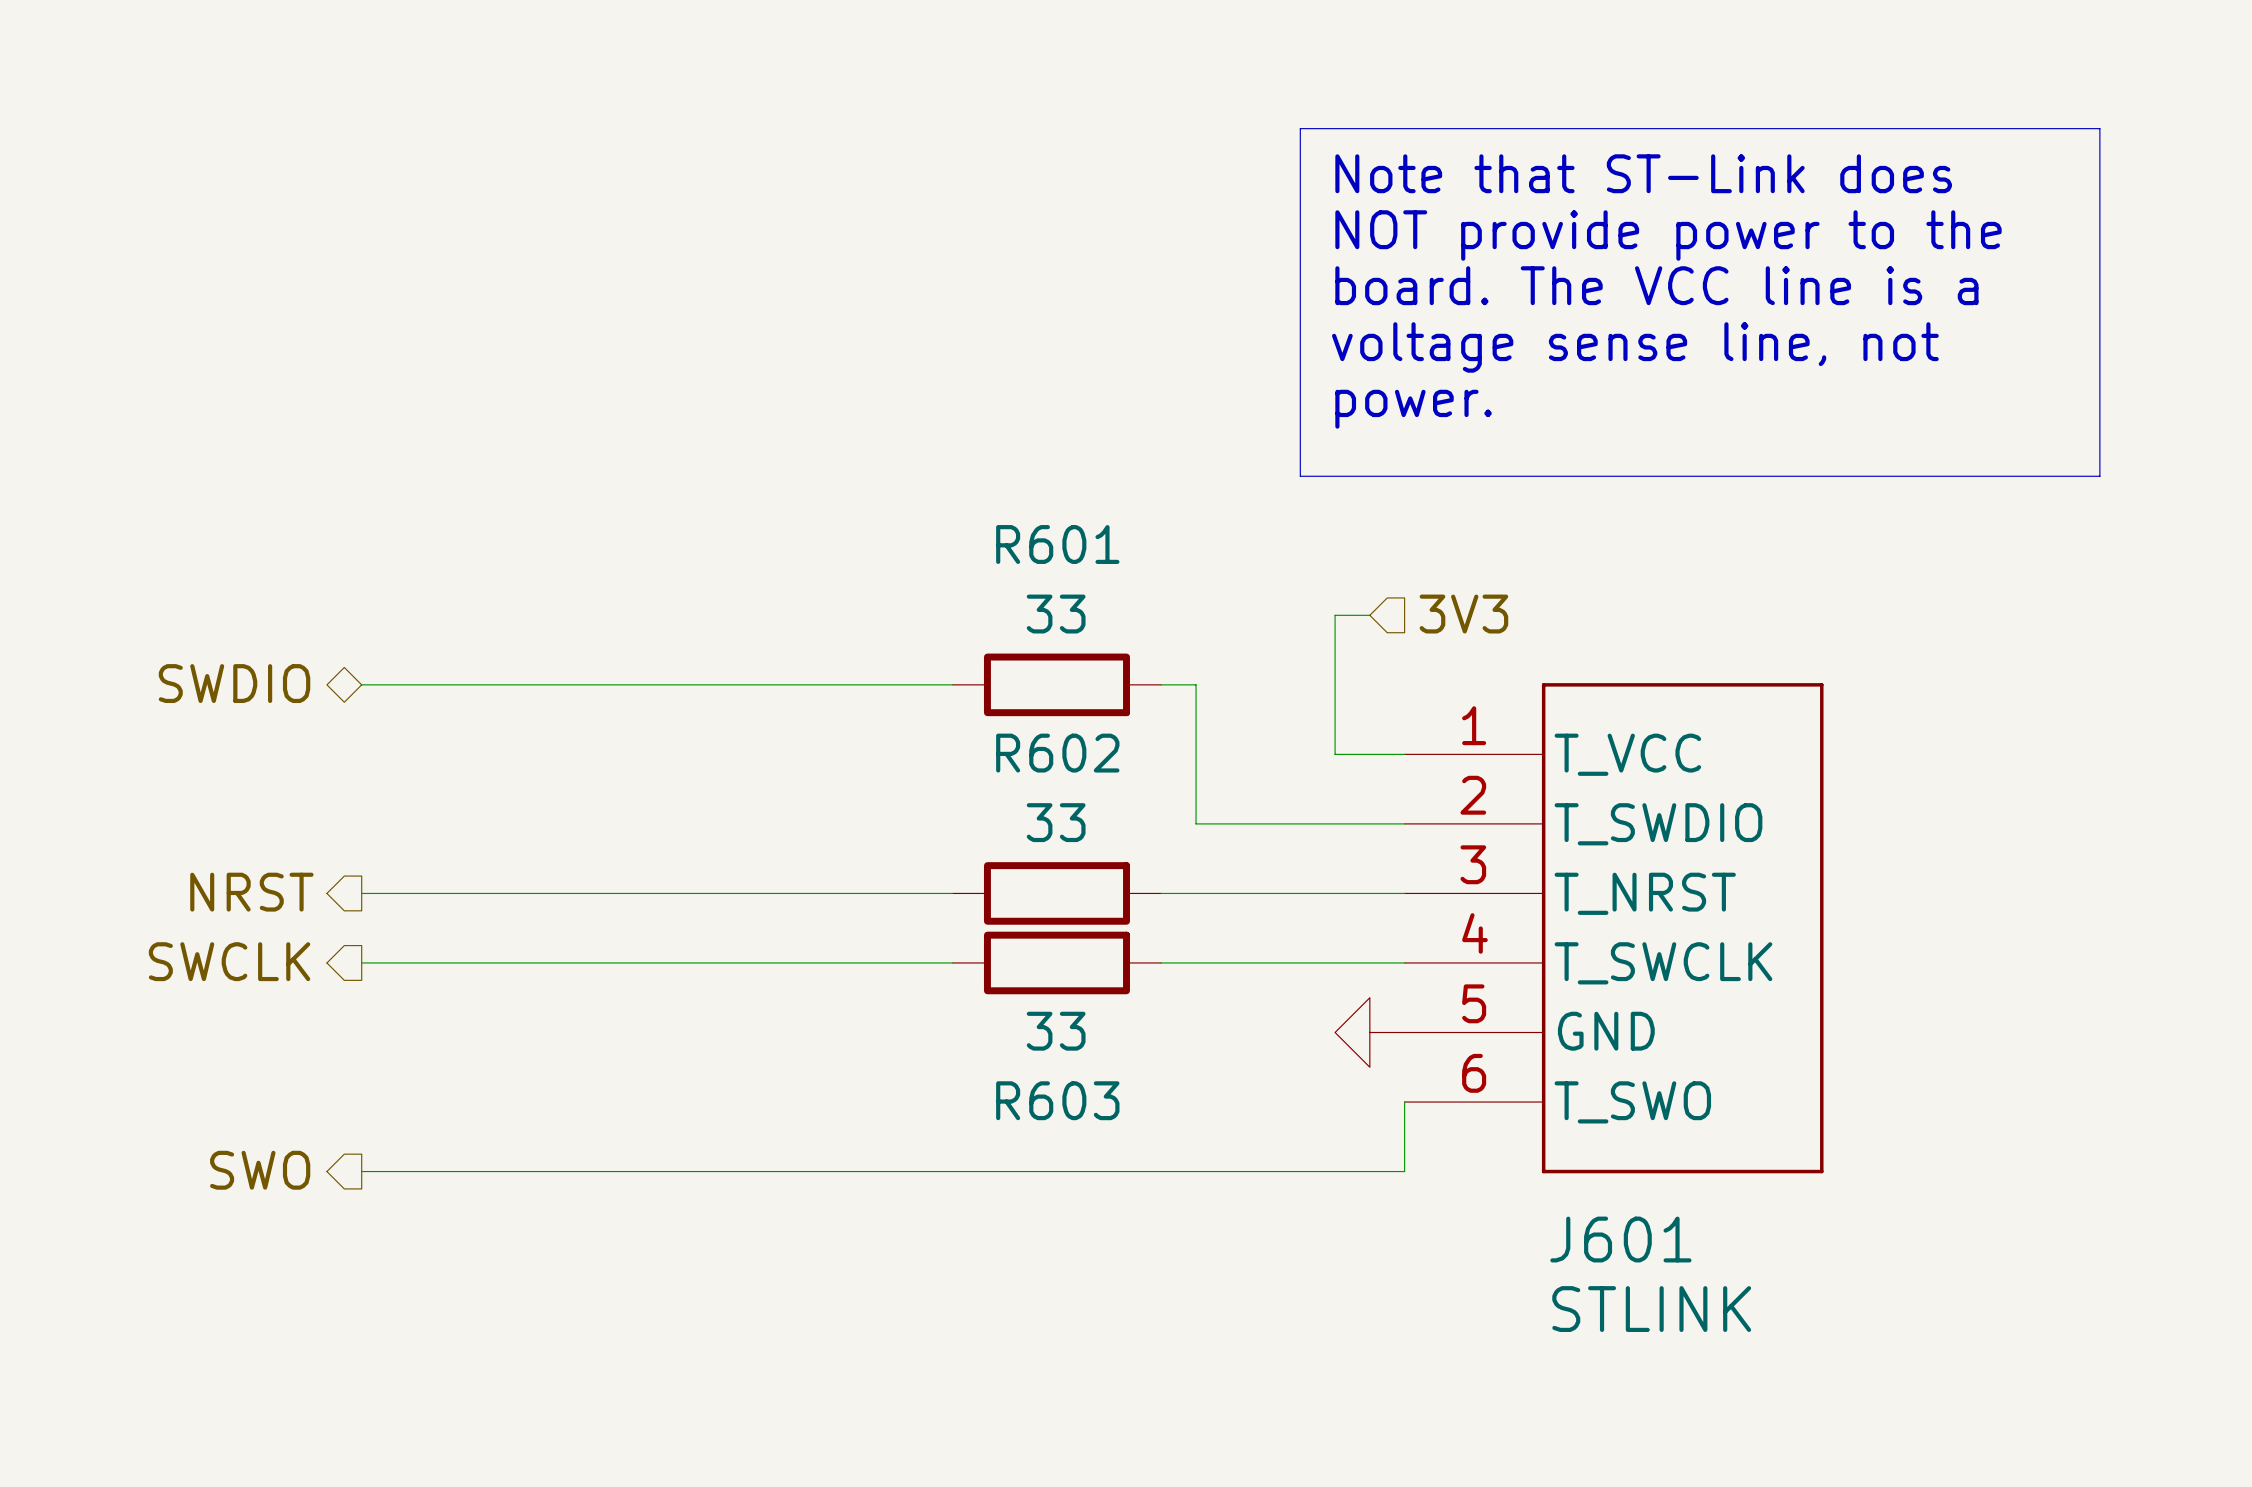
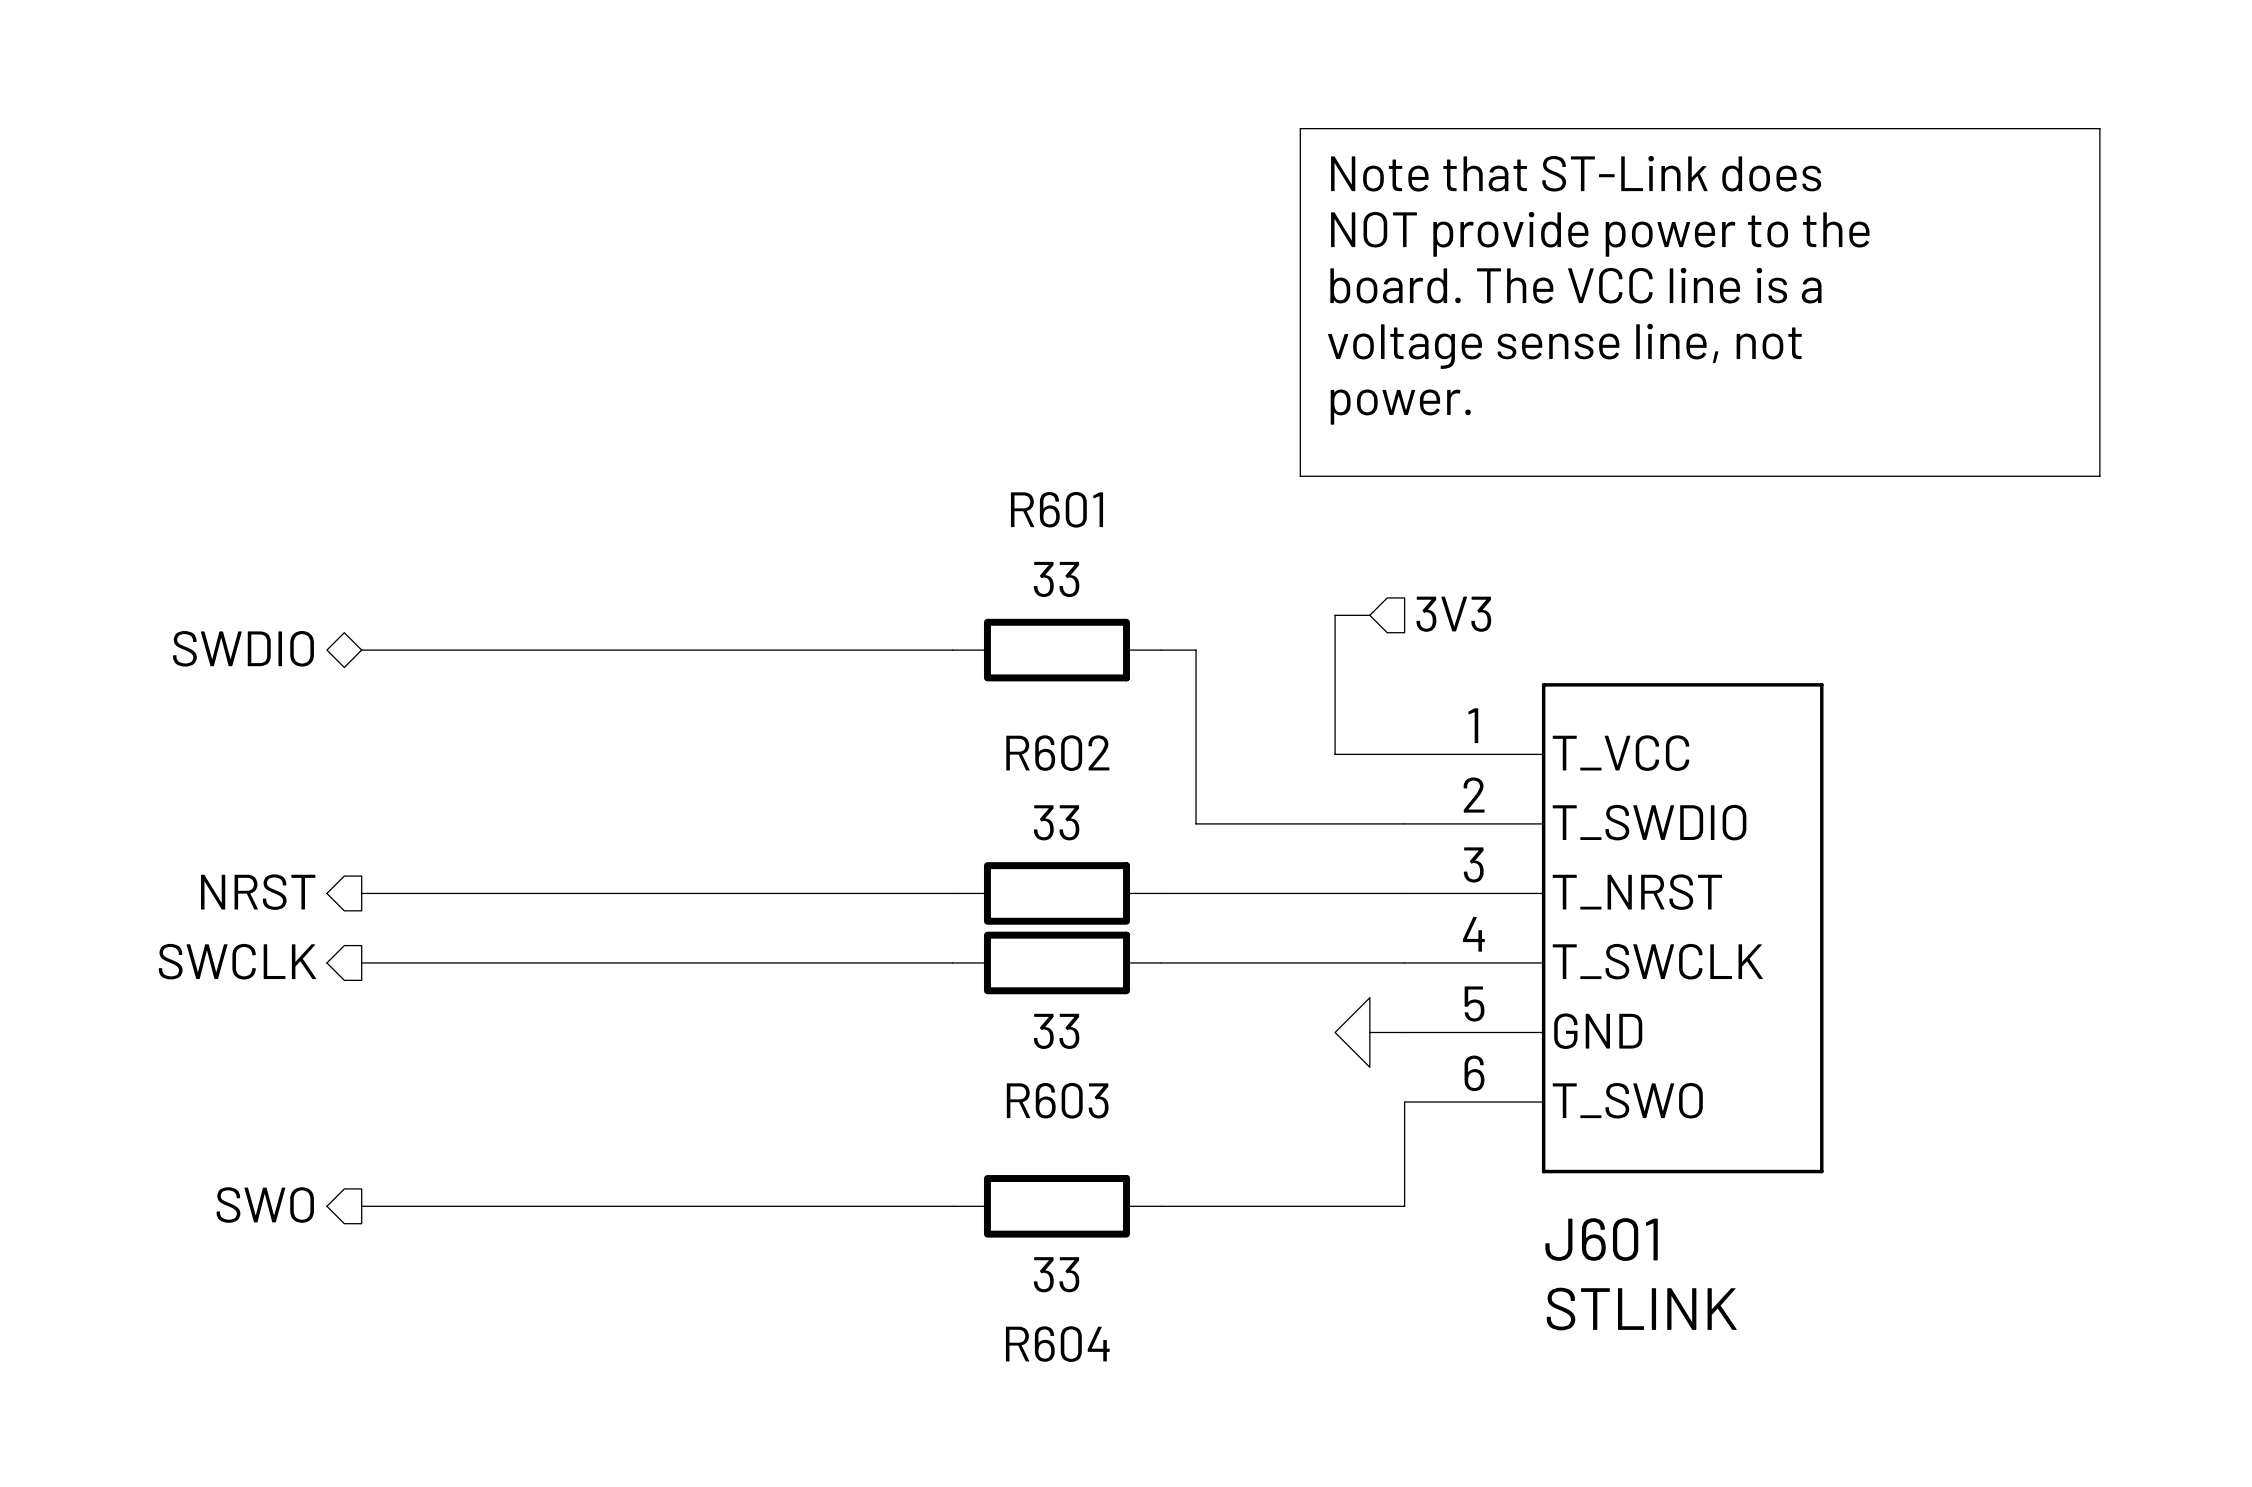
hierarchical label position: SWDIO (234, 683) -> SWDIO (243, 648)
wire: (361, 684) (952, 684) -> (361, 650) (952, 650)
R601 position: (1056, 684) -> (1056, 650)
wire: (1161, 684) (1196, 684) -> (1161, 650) (1196, 650) (1196, 684)
hierarchical label position: SWO (260, 1170) -> SWO (265, 1205)
wire: (361, 1171) (1404, 1171) -> (1161, 1206) (1404, 1206) (1404, 1171)
wire: none -> (361, 1206) (952, 1206)
R604: none -> 33 (1056, 1206)

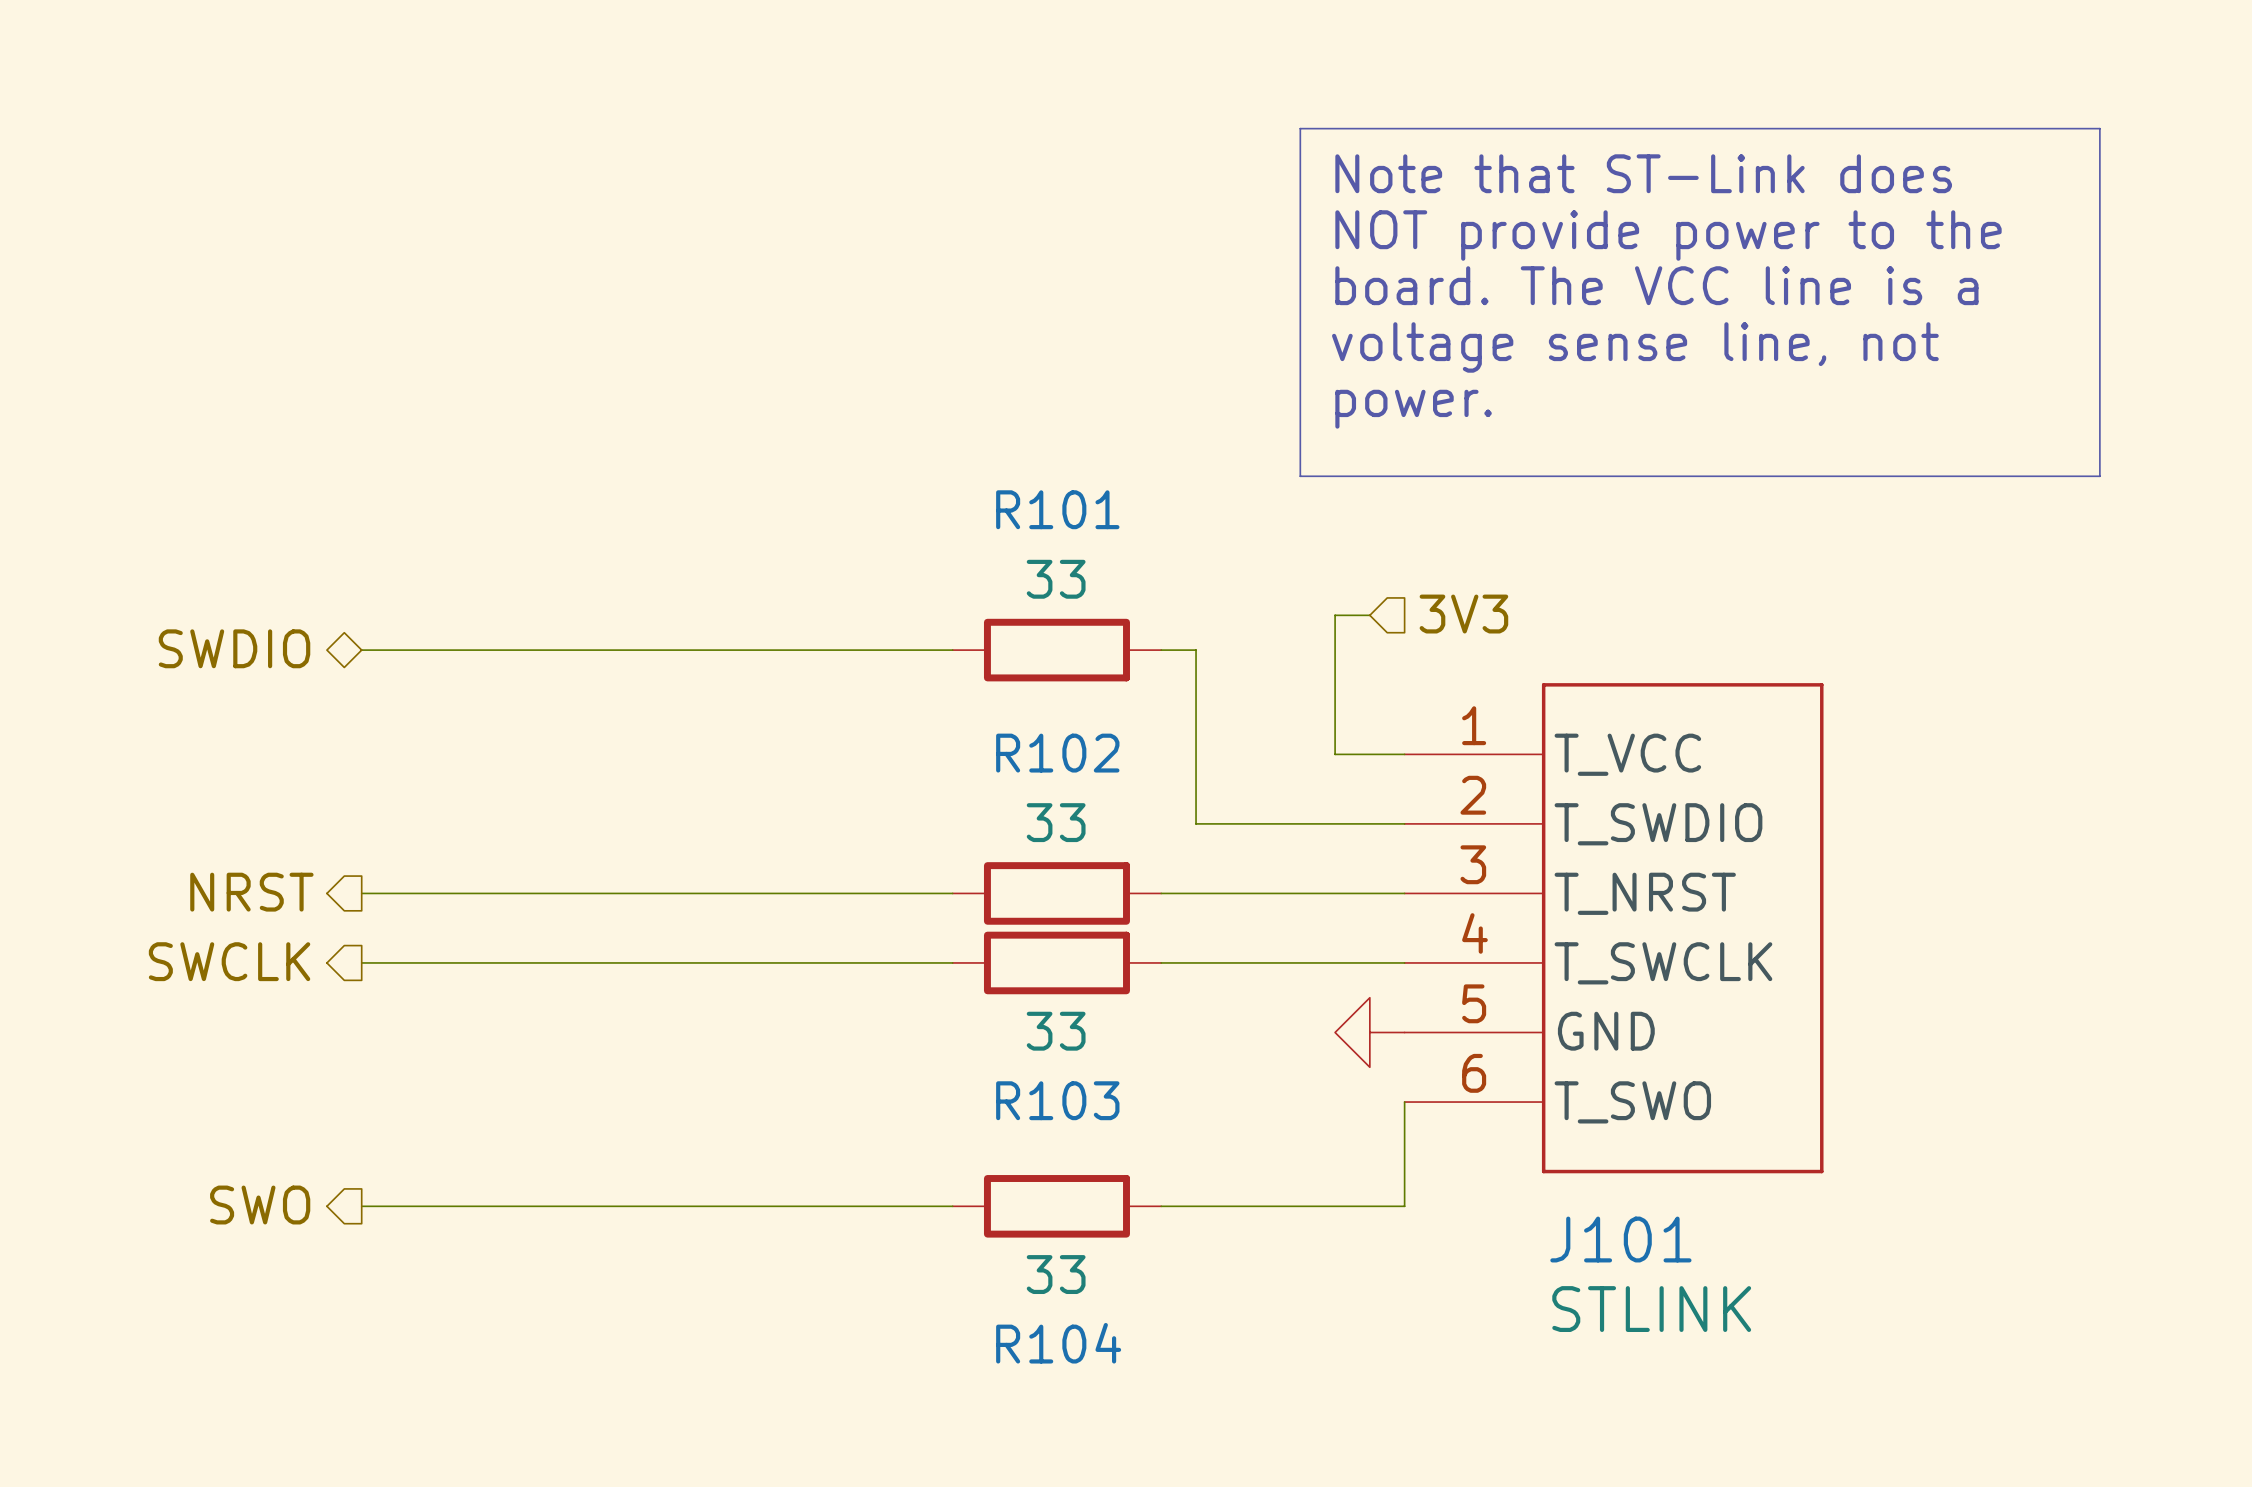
R601 name: R601 (1057, 509) -> R101 (1057, 509)
R602 name: R602 (1057, 753) -> R102 (1057, 753)
R603 name: R603 (1057, 1100) -> R103 (1057, 1100)
J601 name: J601 (1601, 1239) -> J101 (1620, 1239)
R604 name: R604 (1057, 1344) -> R104 (1058, 1343)

